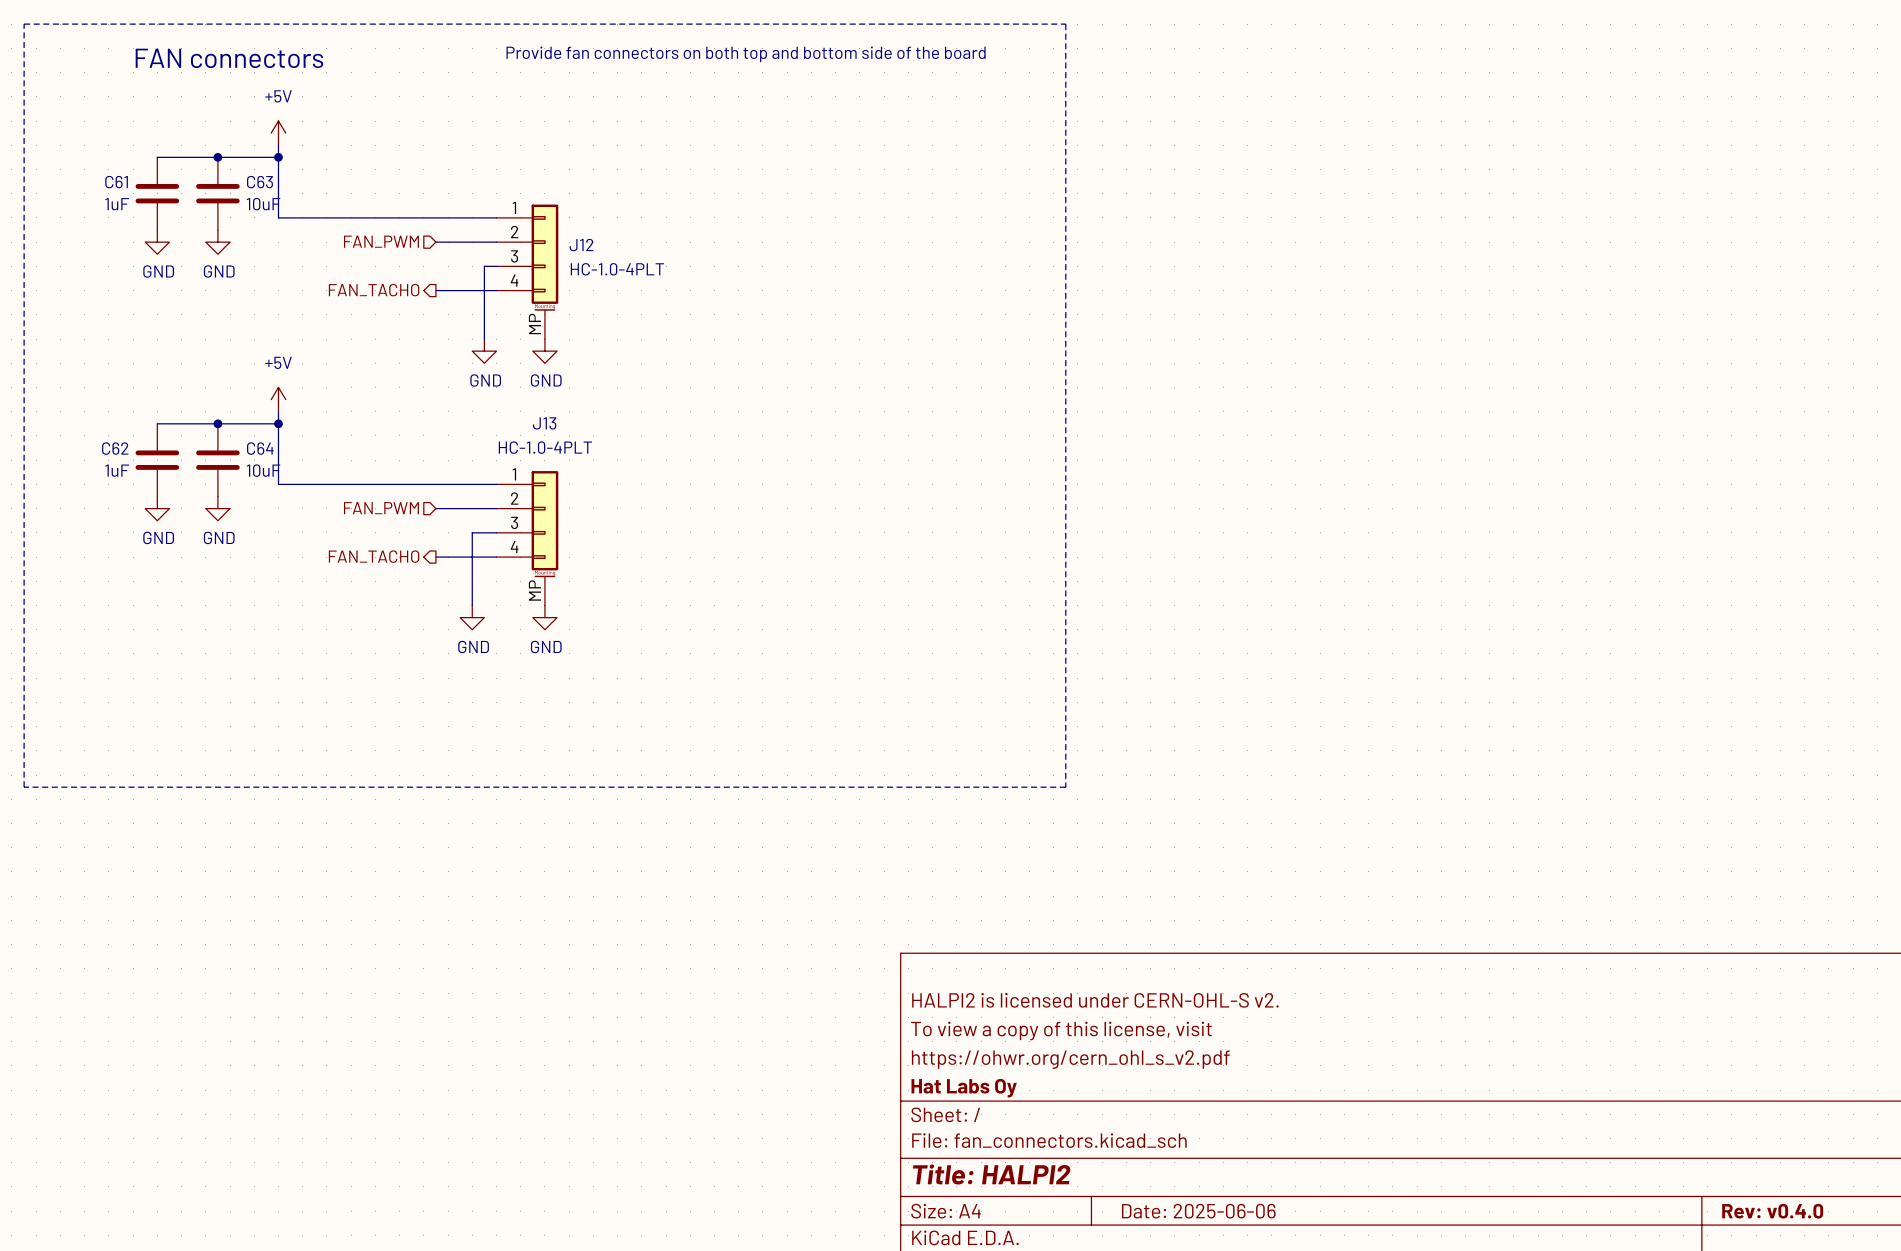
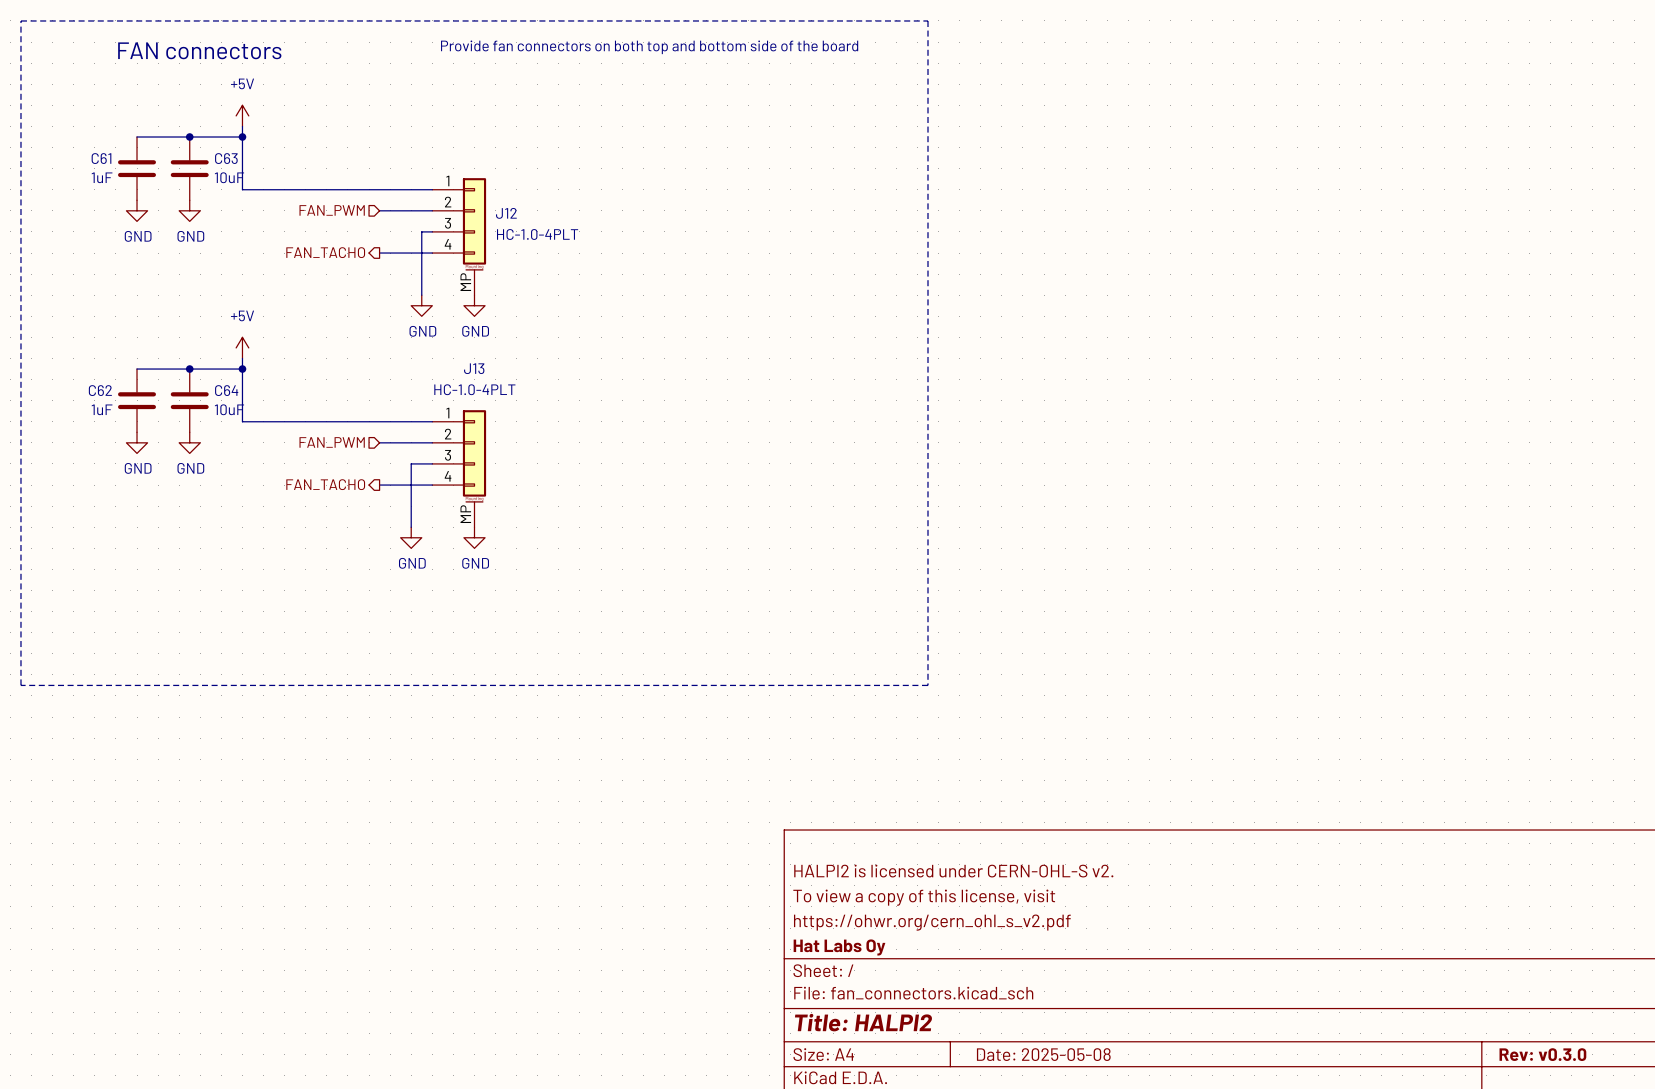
title block: Date: 2025-06-06 (1198, 1211) -> Date: 2025-05-08 (1043, 1054)
title block: Rev: v0.4.0 (1772, 1211) -> Rev: v0.3.0 (1542, 1054)

